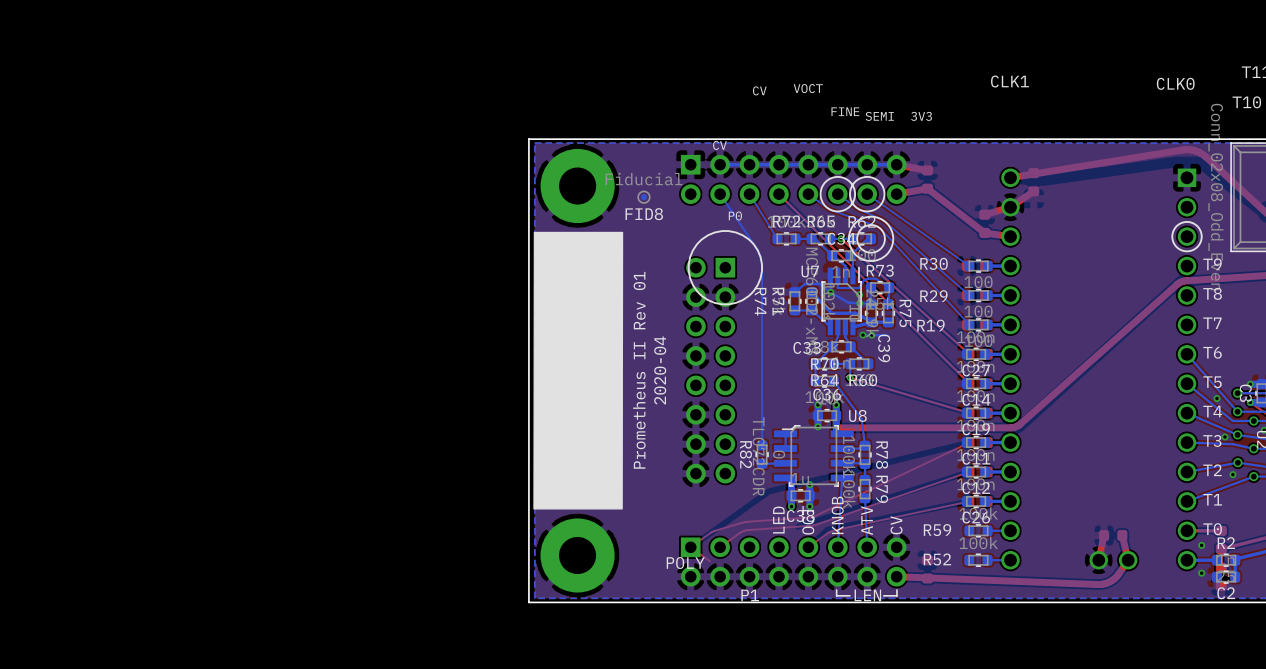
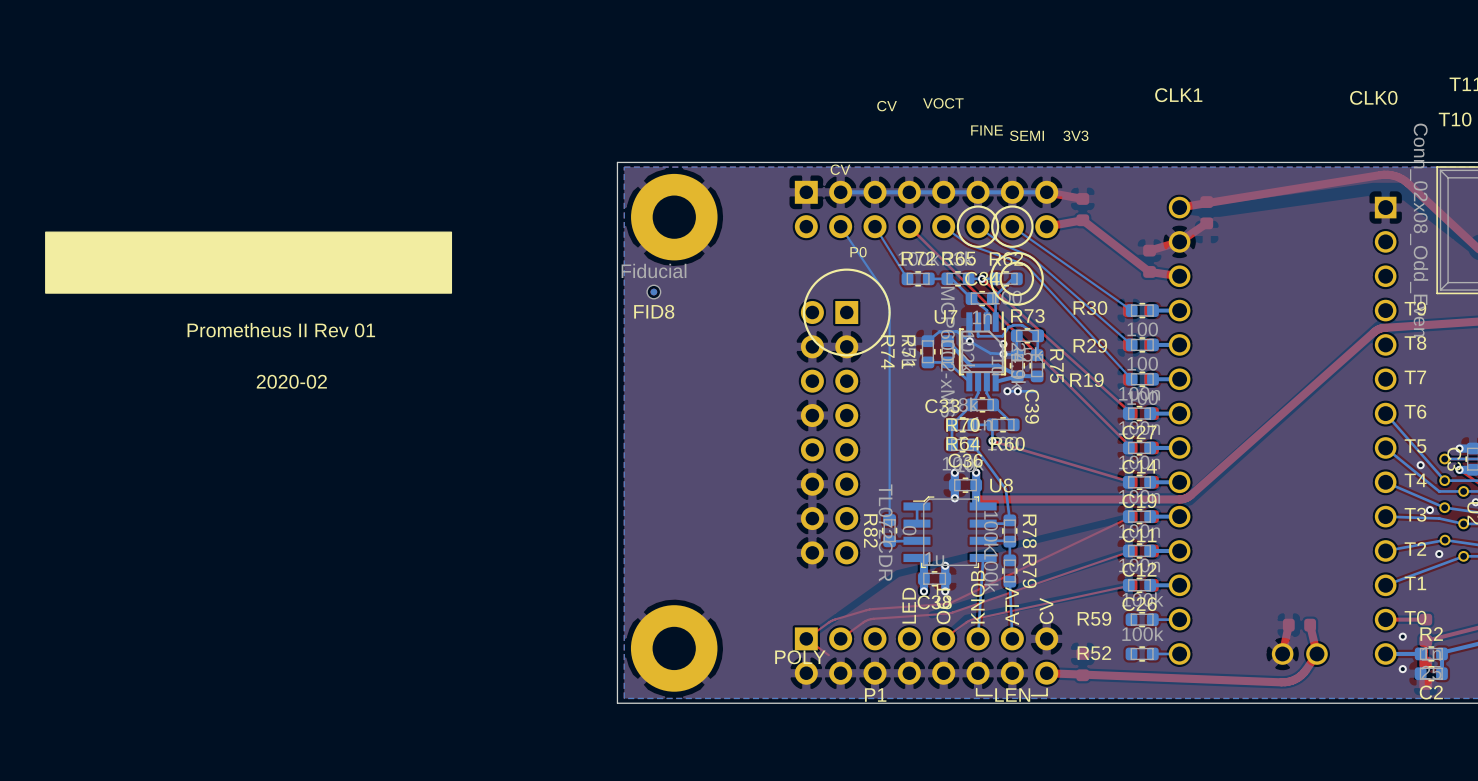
FID8 position: (643, 197) -> (653, 292)
drawing: none -> [45, 231, 453, 294]
drawing: [1171, 221, 1203, 253] -> none
drawing: [533, 231, 624, 510] -> none
text: none -> Prometheus II Rev 01 (281, 330)
text: none -> 2020-02 (291, 381)
text: Prometheus II Rev 01 (639, 370) -> none
text: 2020-04 (660, 370) -> none

